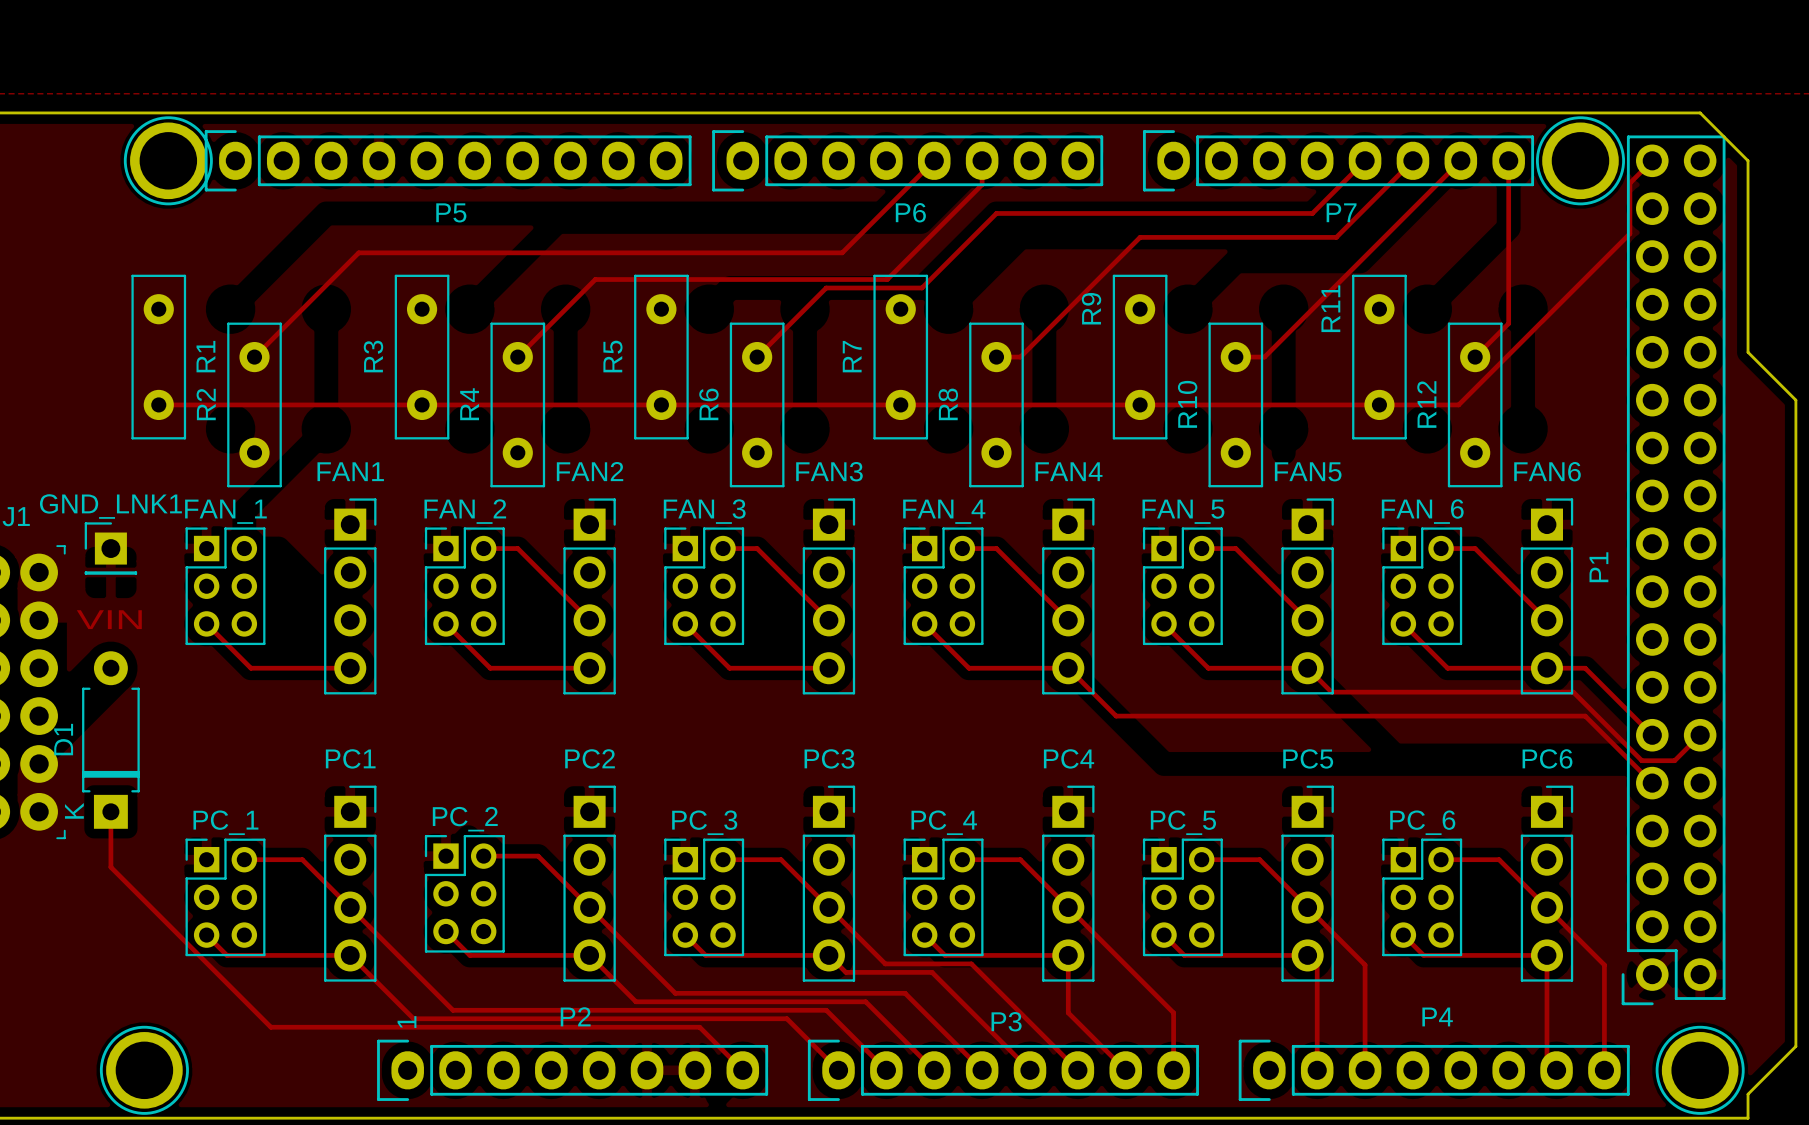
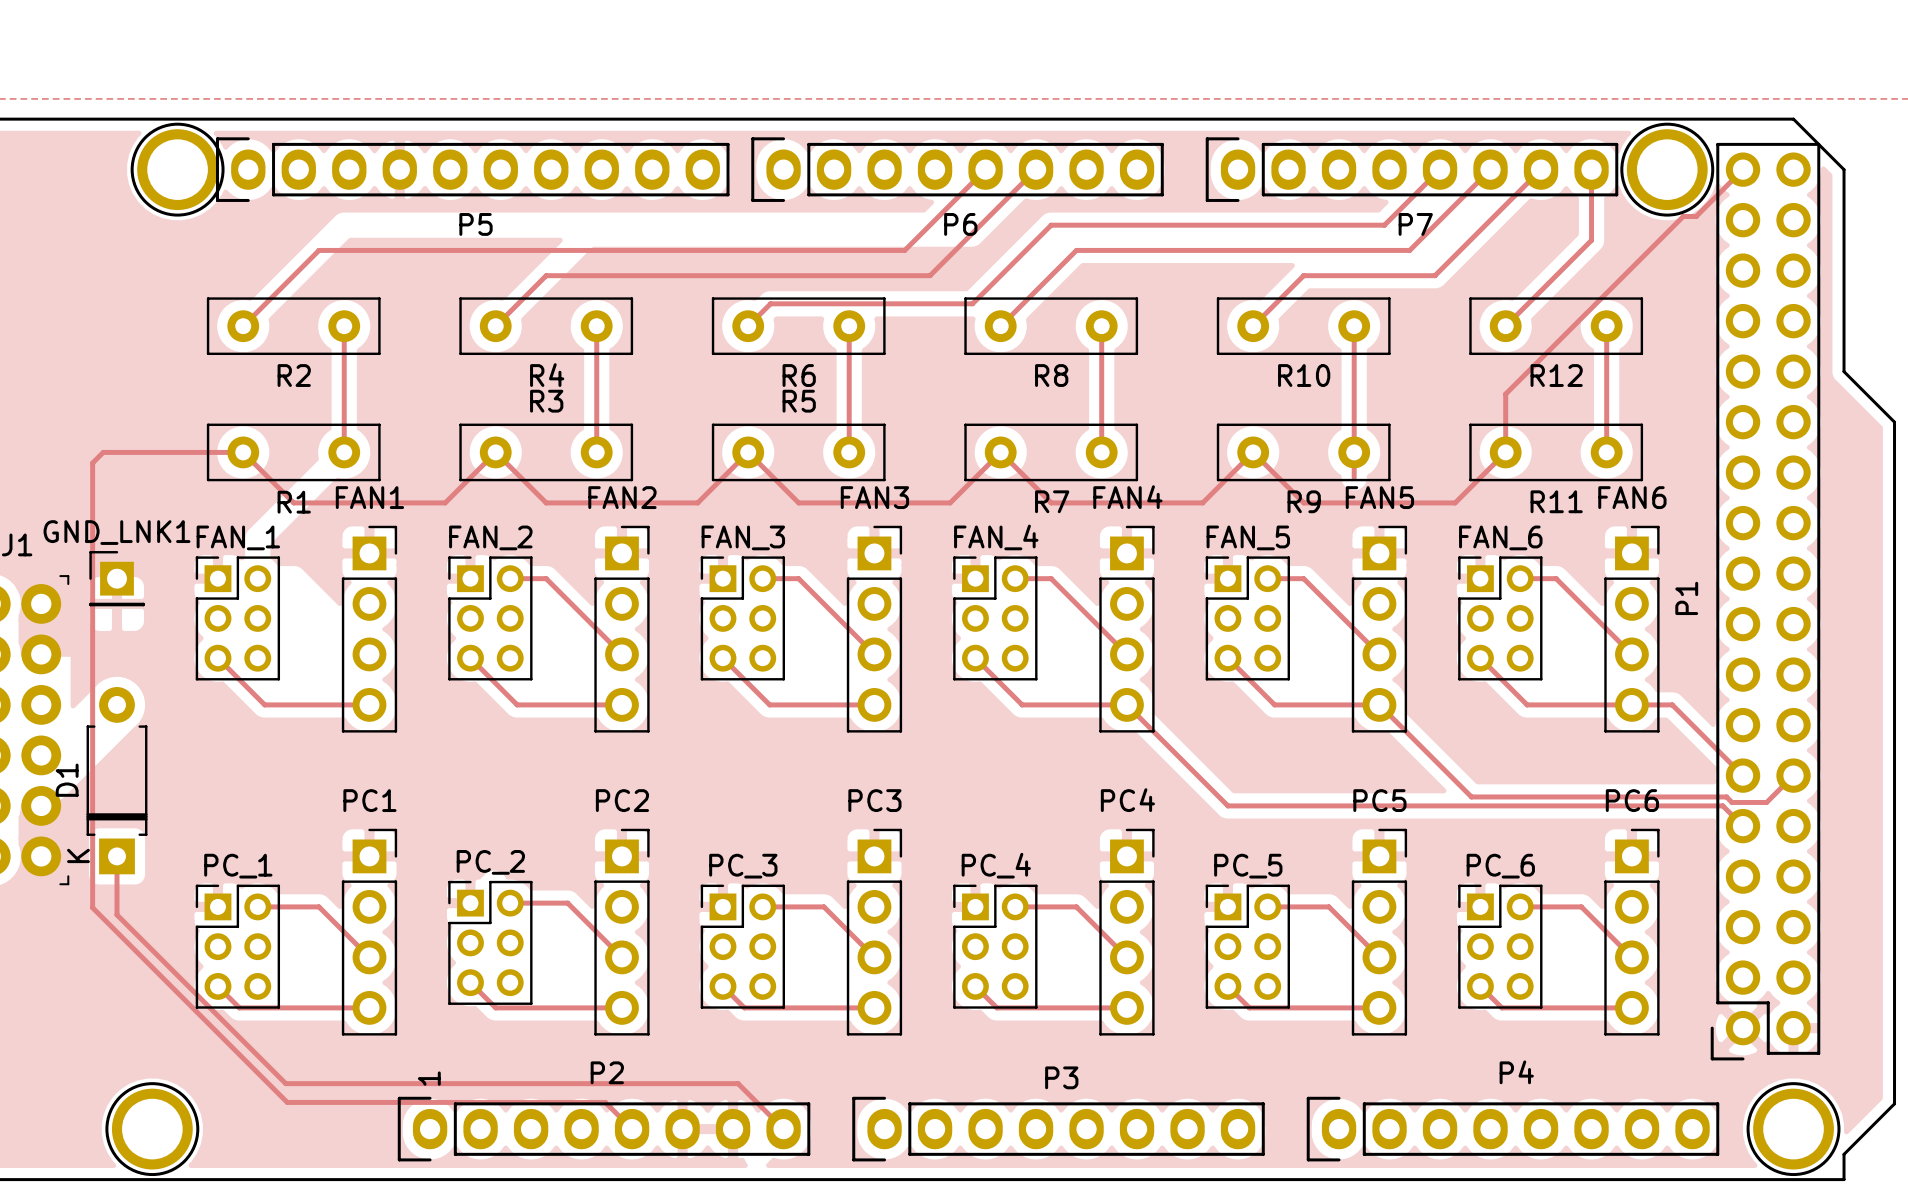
track: (982, 160) (982, 184) (887, 279) (595, 279) (517, 357) -> (1036, 169) (930, 275) (546, 275) (495, 326)
track: (1629, 183) (1629, 233) (1458, 404) (158, 404) -> (1719, 193) (1696, 216) (1683, 216) (1505, 394) (1505, 452) (1455, 502) (1303, 502) (1253, 452) (1202, 502) (1051, 502) (1000, 452) (950, 502) (798, 502) (748, 452) (697, 502) (546, 502) (495, 452) (445, 502) (293, 502) (243, 452) (103, 452) (92, 463) (92, 907) (287, 1102) (605, 1102) (632, 1129)
track: (1508, 227) (1508, 323) (1475, 357) -> (1591, 240) (1505, 326)
track: (857, 237) (842, 252) (358, 252) (254, 357) -> (904, 250) (318, 250) (243, 326)
track: (1140, 237) (1020, 357) (996, 357) -> (1202, 250) (1076, 250) (1000, 326)
track: (1360, 261) (1264, 357) (1235, 357) -> (1434, 275) (1303, 275) (1253, 326)
track: (826, 288) (757, 357) -> (871, 303) (770, 303) (748, 326)
R9 name position: R9 (1091, 308) -> R9 (1304, 501)
R11 name position: R11 (1330, 308) -> R11 (1556, 501)
track: none -> (344, 326) (344, 452)
track: none -> (596, 326) (596, 452)
track: none -> (849, 326) (849, 452)
track: none -> (1101, 326) (1101, 452)
track: none -> (1354, 326) (1354, 477)
track: none -> (1606, 326) (1606, 452)
R7 name position: R7 (852, 356) -> R7 (1052, 501)
R1 rotation: 0° (158, 357) -> 90° clockwise (293, 452)
R1 position: (158, 357) -> (293, 452)
R3 rotation: 0° (422, 357) -> 90° clockwise (546, 452)
R3 position: (422, 357) -> (546, 452)
R5 rotation: 0° (661, 357) -> 90° clockwise (798, 452)
R5 position: (661, 357) -> (798, 452)
R7 rotation: 0° (900, 357) -> 90° clockwise (1051, 452)
R7 position: (900, 357) -> (1051, 452)
R9 rotation: 0° (1140, 357) -> 90° clockwise (1303, 452)
R9 position: (1140, 357) -> (1303, 452)
R11 rotation: 0° (1379, 357) -> 90° clockwise (1556, 452)
R11 position: (1379, 357) -> (1556, 452)
R2 name position: R2 (206, 404) -> R2 (294, 375)
R2 rotation: 0° (254, 404) -> 90° clockwise (293, 326)
R4 name position: R4 (469, 404) -> R4 (547, 375)
R4 rotation: 0° (517, 404) -> 90° clockwise (546, 326)
R6 name position: R6 (708, 404) -> R6 (799, 375)
R6 rotation: 0° (757, 404) -> 90° clockwise (798, 326)
R8 name position: R8 (948, 404) -> R8 (1051, 375)
R8 rotation: 0° (996, 404) -> 90° clockwise (1051, 326)
R10 name position: R10 (1187, 404) -> R10 (1304, 375)
R10 rotation: 0° (1235, 404) -> 90° clockwise (1303, 326)
R12 name position: R12 (1426, 404) -> R12 (1556, 375)
R12 rotation: 0° (1475, 404) -> 90° clockwise (1556, 326)
text: VIN (109, 619) -> none
track: (1331, 692) (1573, 692) (1641, 760) -> (1404, 730) (1471, 796) (1726, 796) (1732, 802)
track: (1116, 716) (1585, 716) (1633, 763) -> (1177, 755) (1227, 805) (1722, 805)
track: (350, 907) (452, 1010) (826, 1010) (886, 1070) -> none
track: (589, 907) (675, 993) (905, 993) (982, 1070) -> none
track: (828, 907) (885, 963) (971, 963) (1077, 1070) -> none
track: (1068, 907) (1173, 1012) (1173, 1070) -> none
track: (1307, 907) (1365, 965) (1365, 1070) -> none
track: (1546, 907) (1604, 965) (1604, 1070) -> none
track: (350, 955) (413, 1018) (786, 1018) (838, 1070) -> none
track: (589, 955) (635, 1001) (865, 1001) (934, 1070) -> none
track: (828, 955) (845, 972) (932, 972) (1029, 1070) -> none
track: (1068, 955) (1068, 1012) (1125, 1070) -> none
track: (1307, 955) (1317, 965) (1317, 1070) -> none
track: (1546, 955) (1546, 1060) (1556, 1070) -> none

